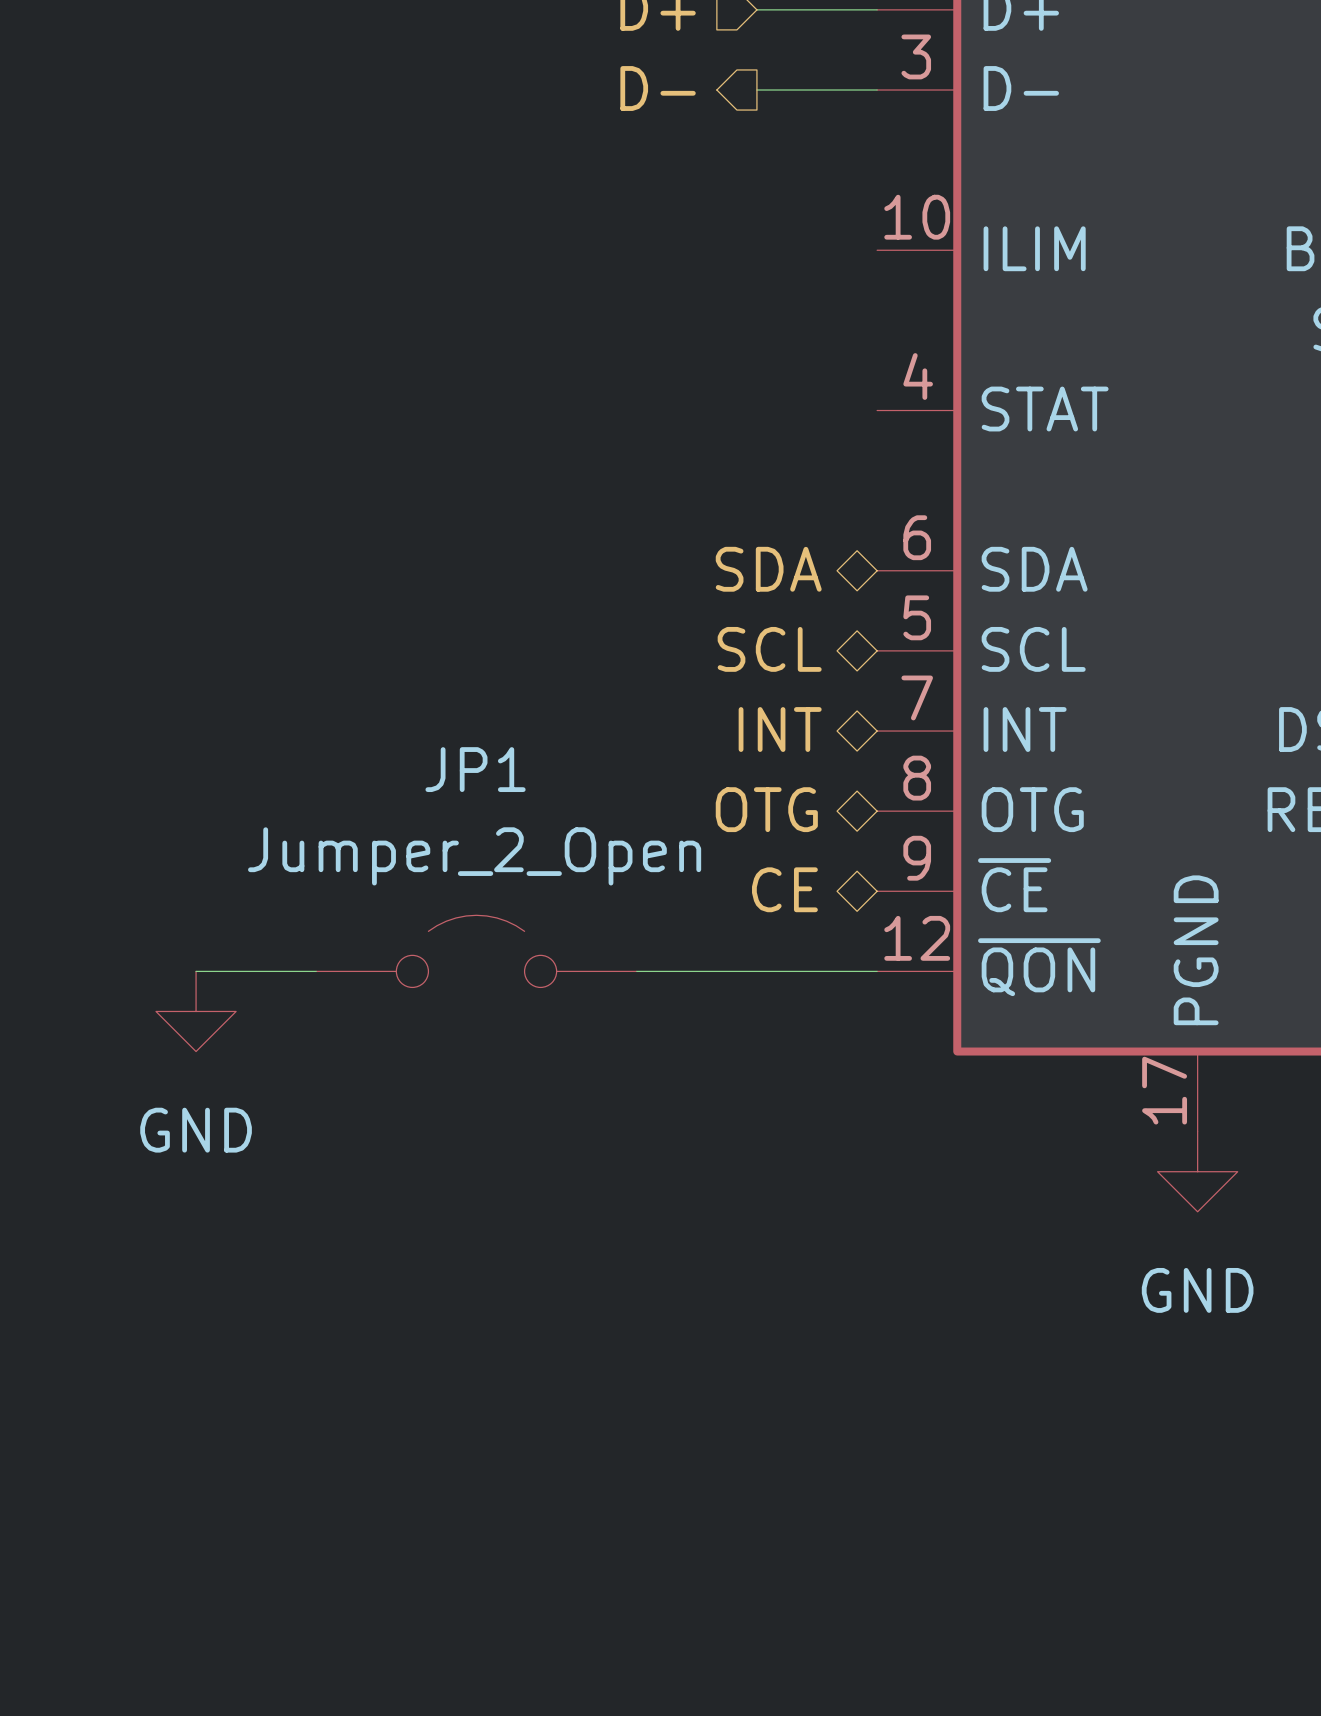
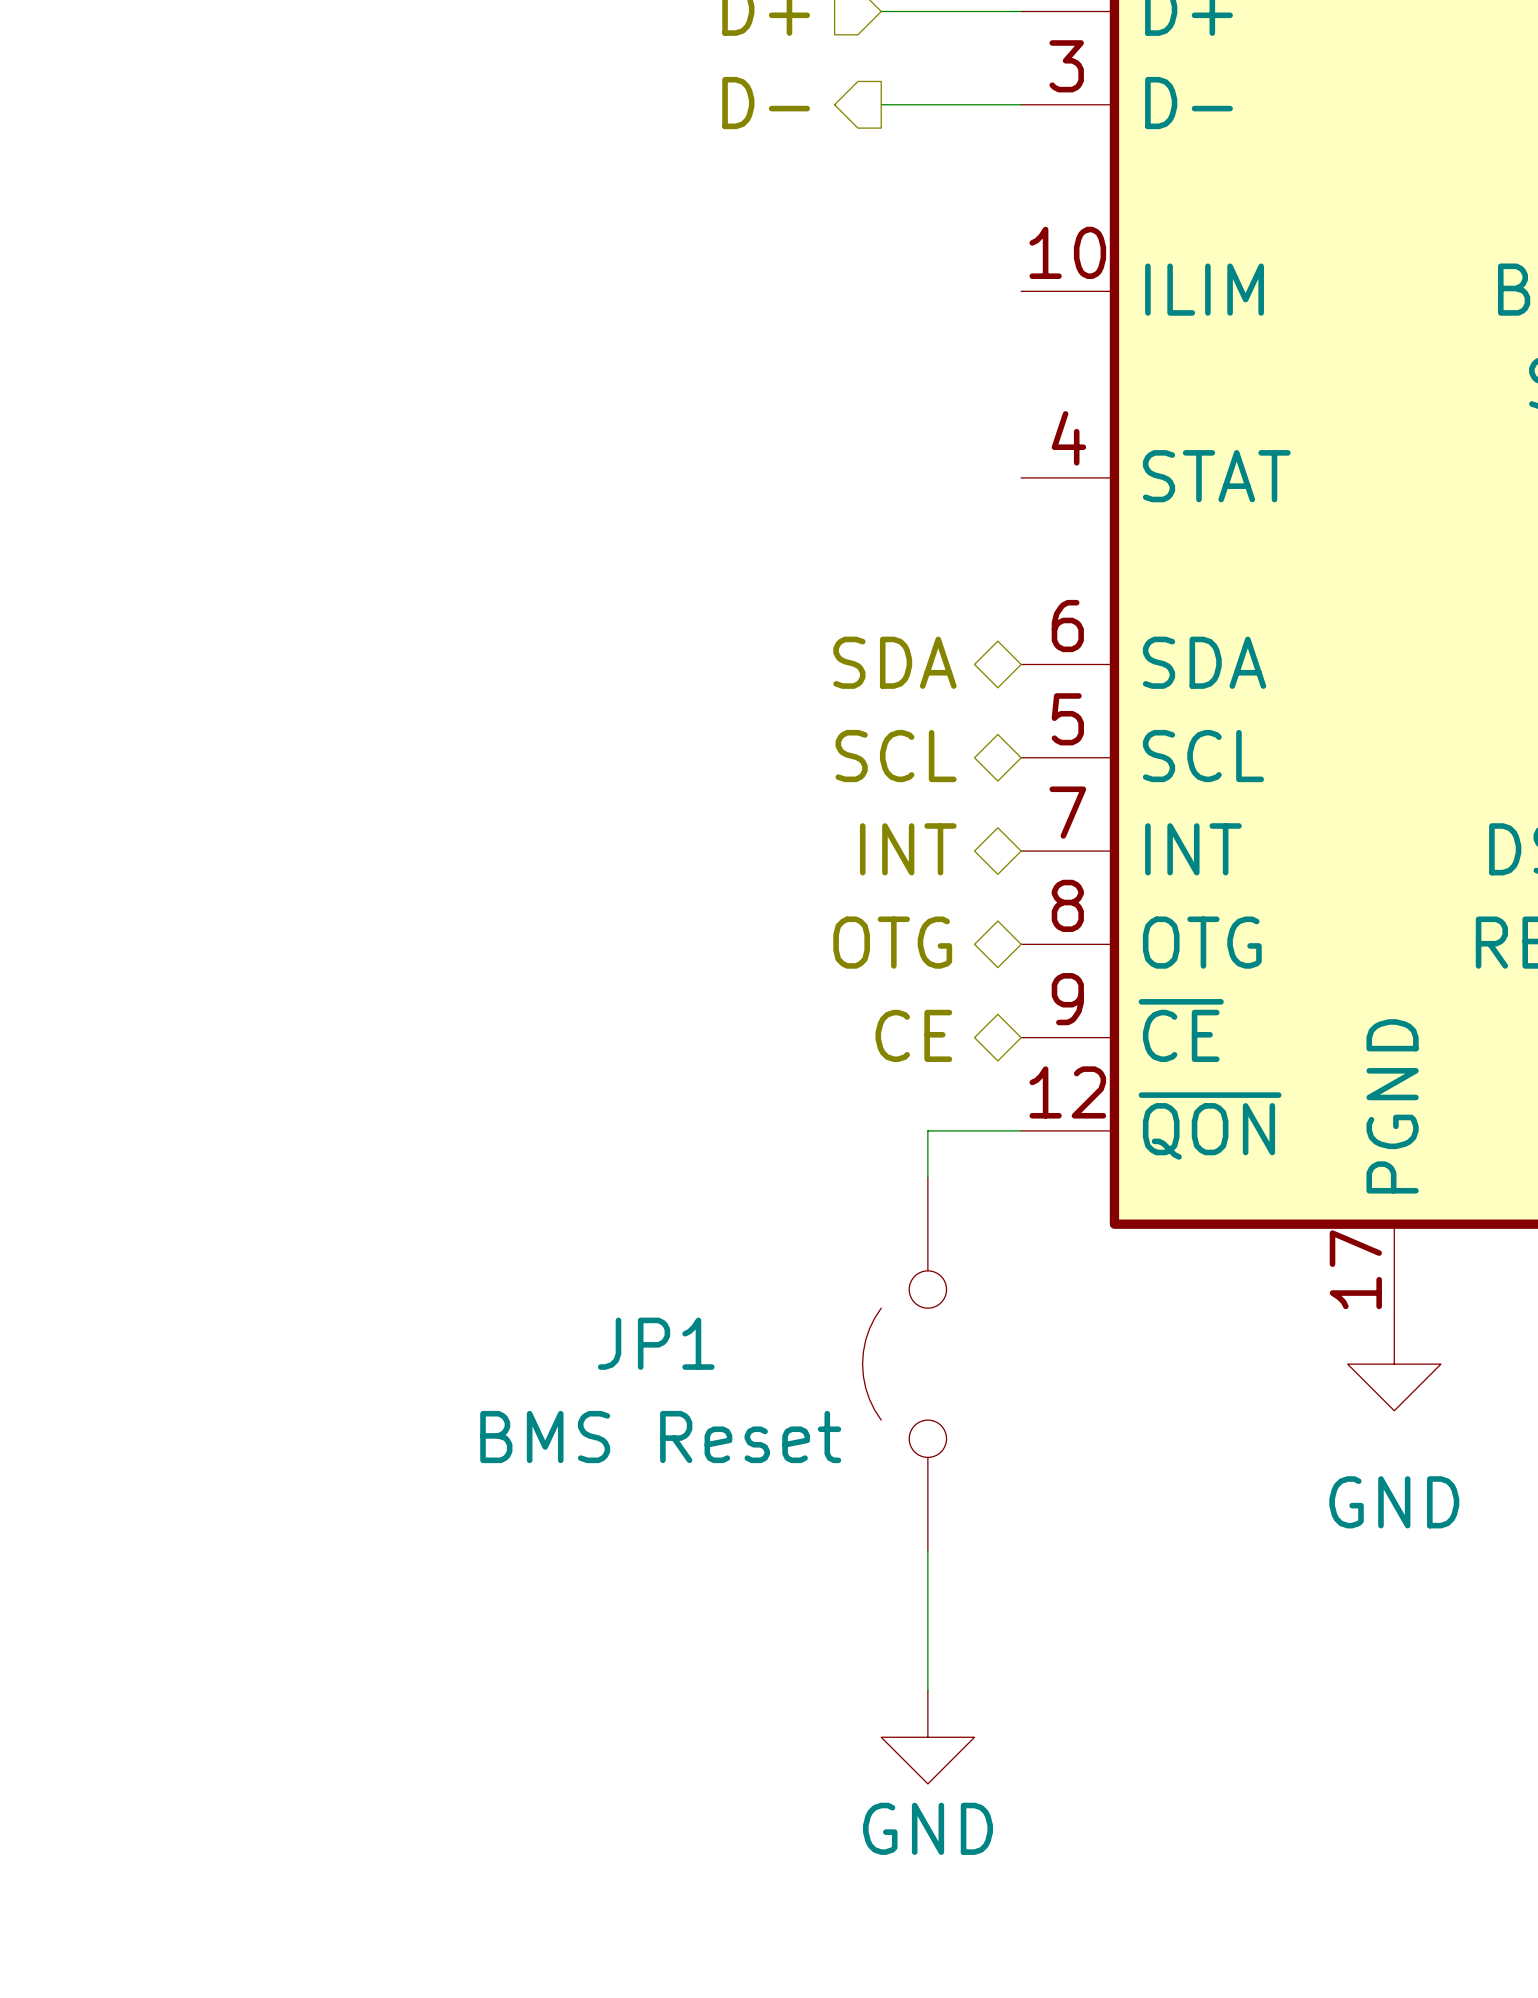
JP1 value: Jumper_2_Open (474, 856) -> BMS Reset (660, 1437)
JP1 rotation: 0° (476, 951) -> 90° counterclockwise (904, 1364)
JP1 position: (476, 951) -> (904, 1364)
wire: (196, 971) (316, 971) -> none
wire: (636, 971) (797, 971) -> (927, 1177) (927, 1130)
power symbol position: GND (196, 1011) -> GND (927, 1737)
power symbol text position: GND (196, 1130) -> GND (928, 1828)
wire: none -> (927, 1550) (927, 1690)

